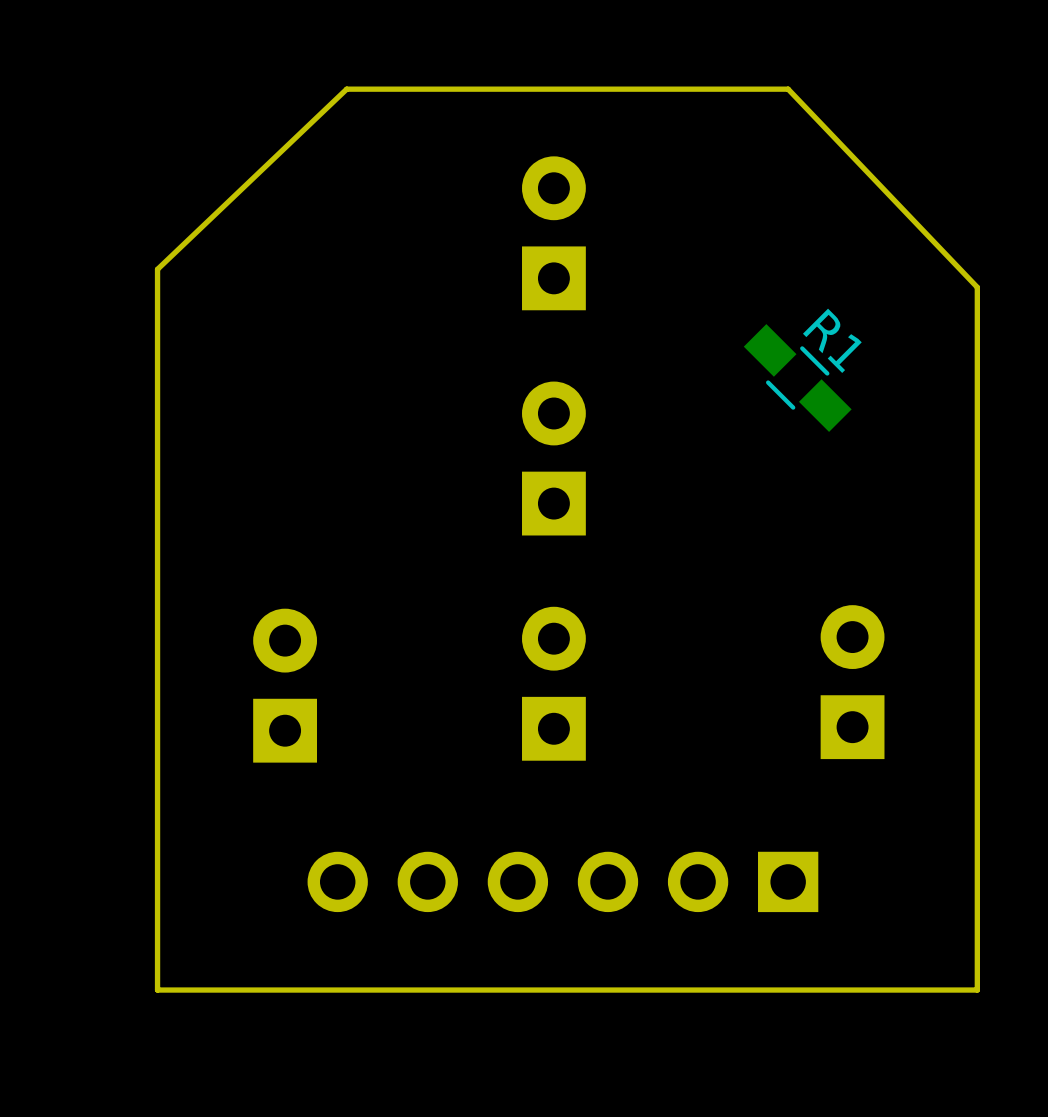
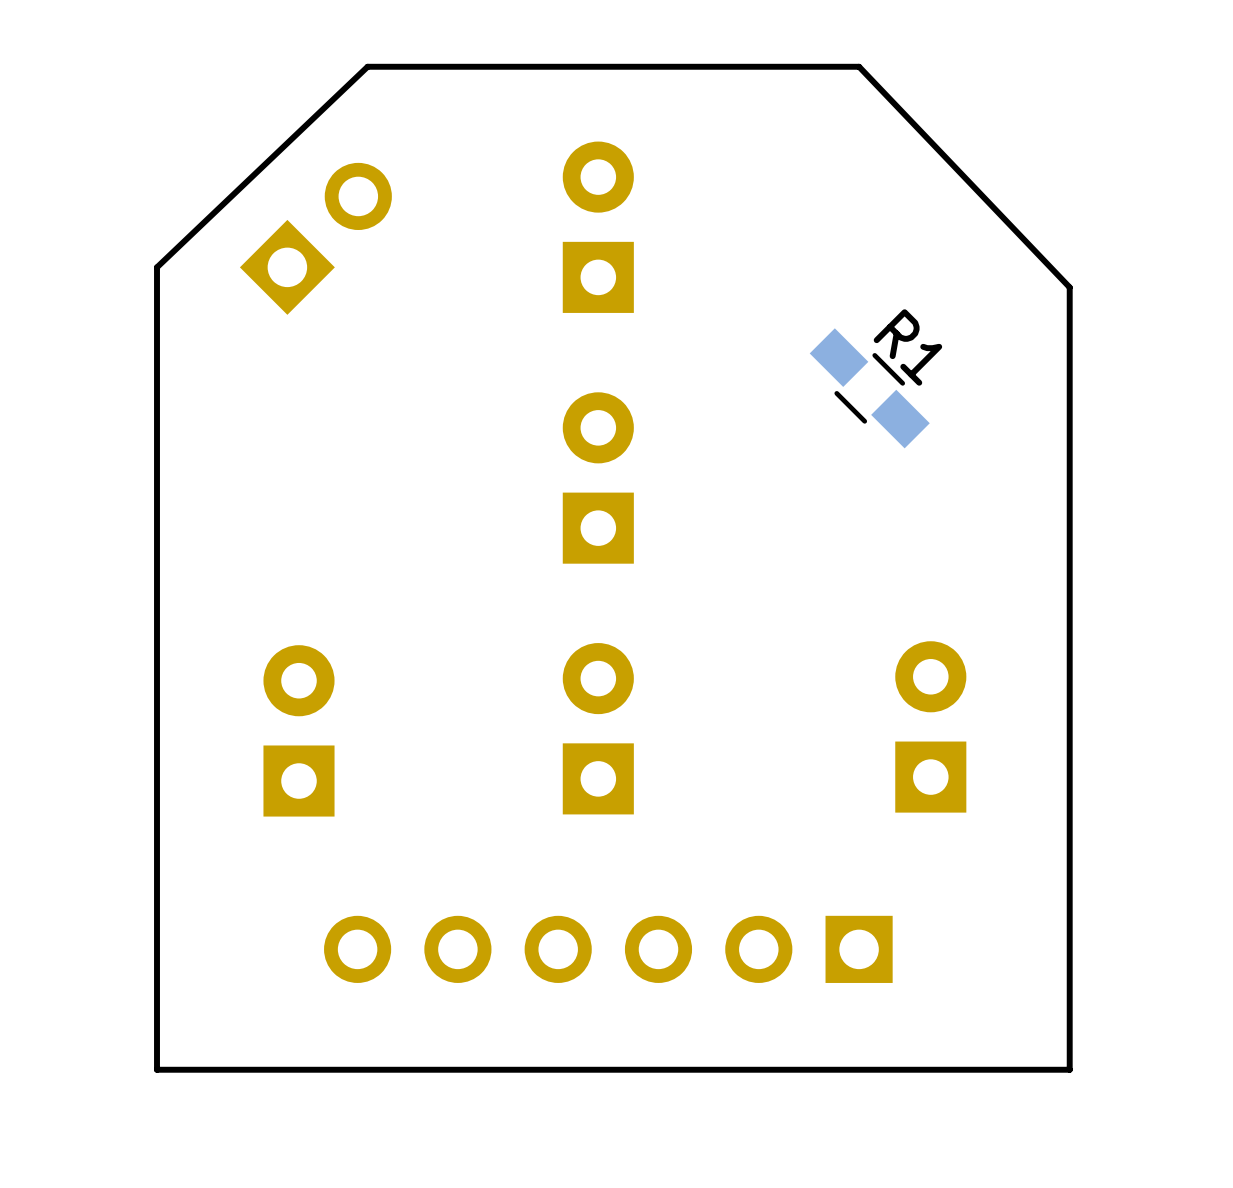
part: none -> (315, 238)

